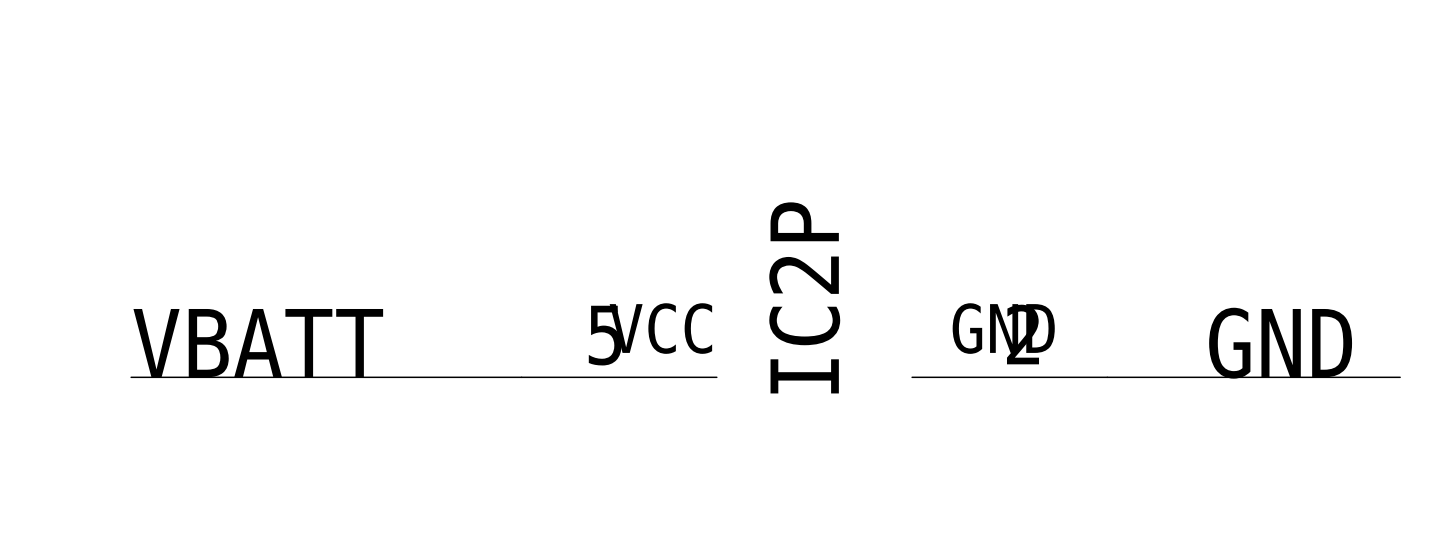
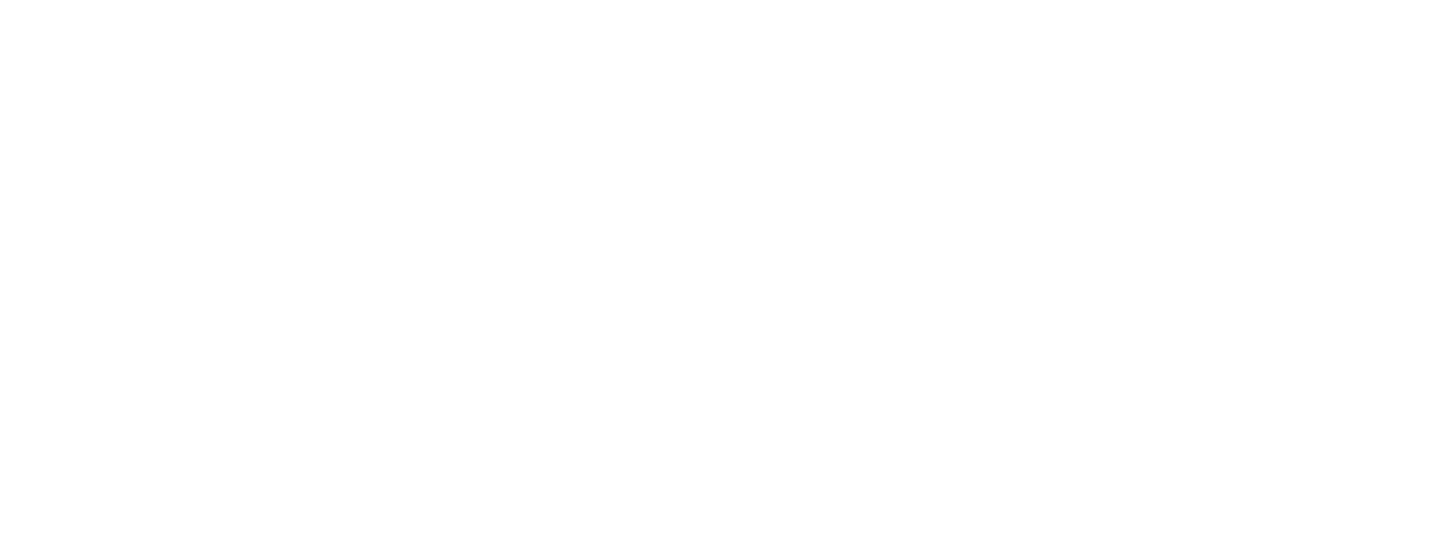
label: VBATT (258, 343) -> none
label: GND (1280, 343) -> none
wire: (131, 377) (521, 377) -> none
IC2P: (814, 377) -> none
wire: (1107, 377) (1400, 377) -> none

